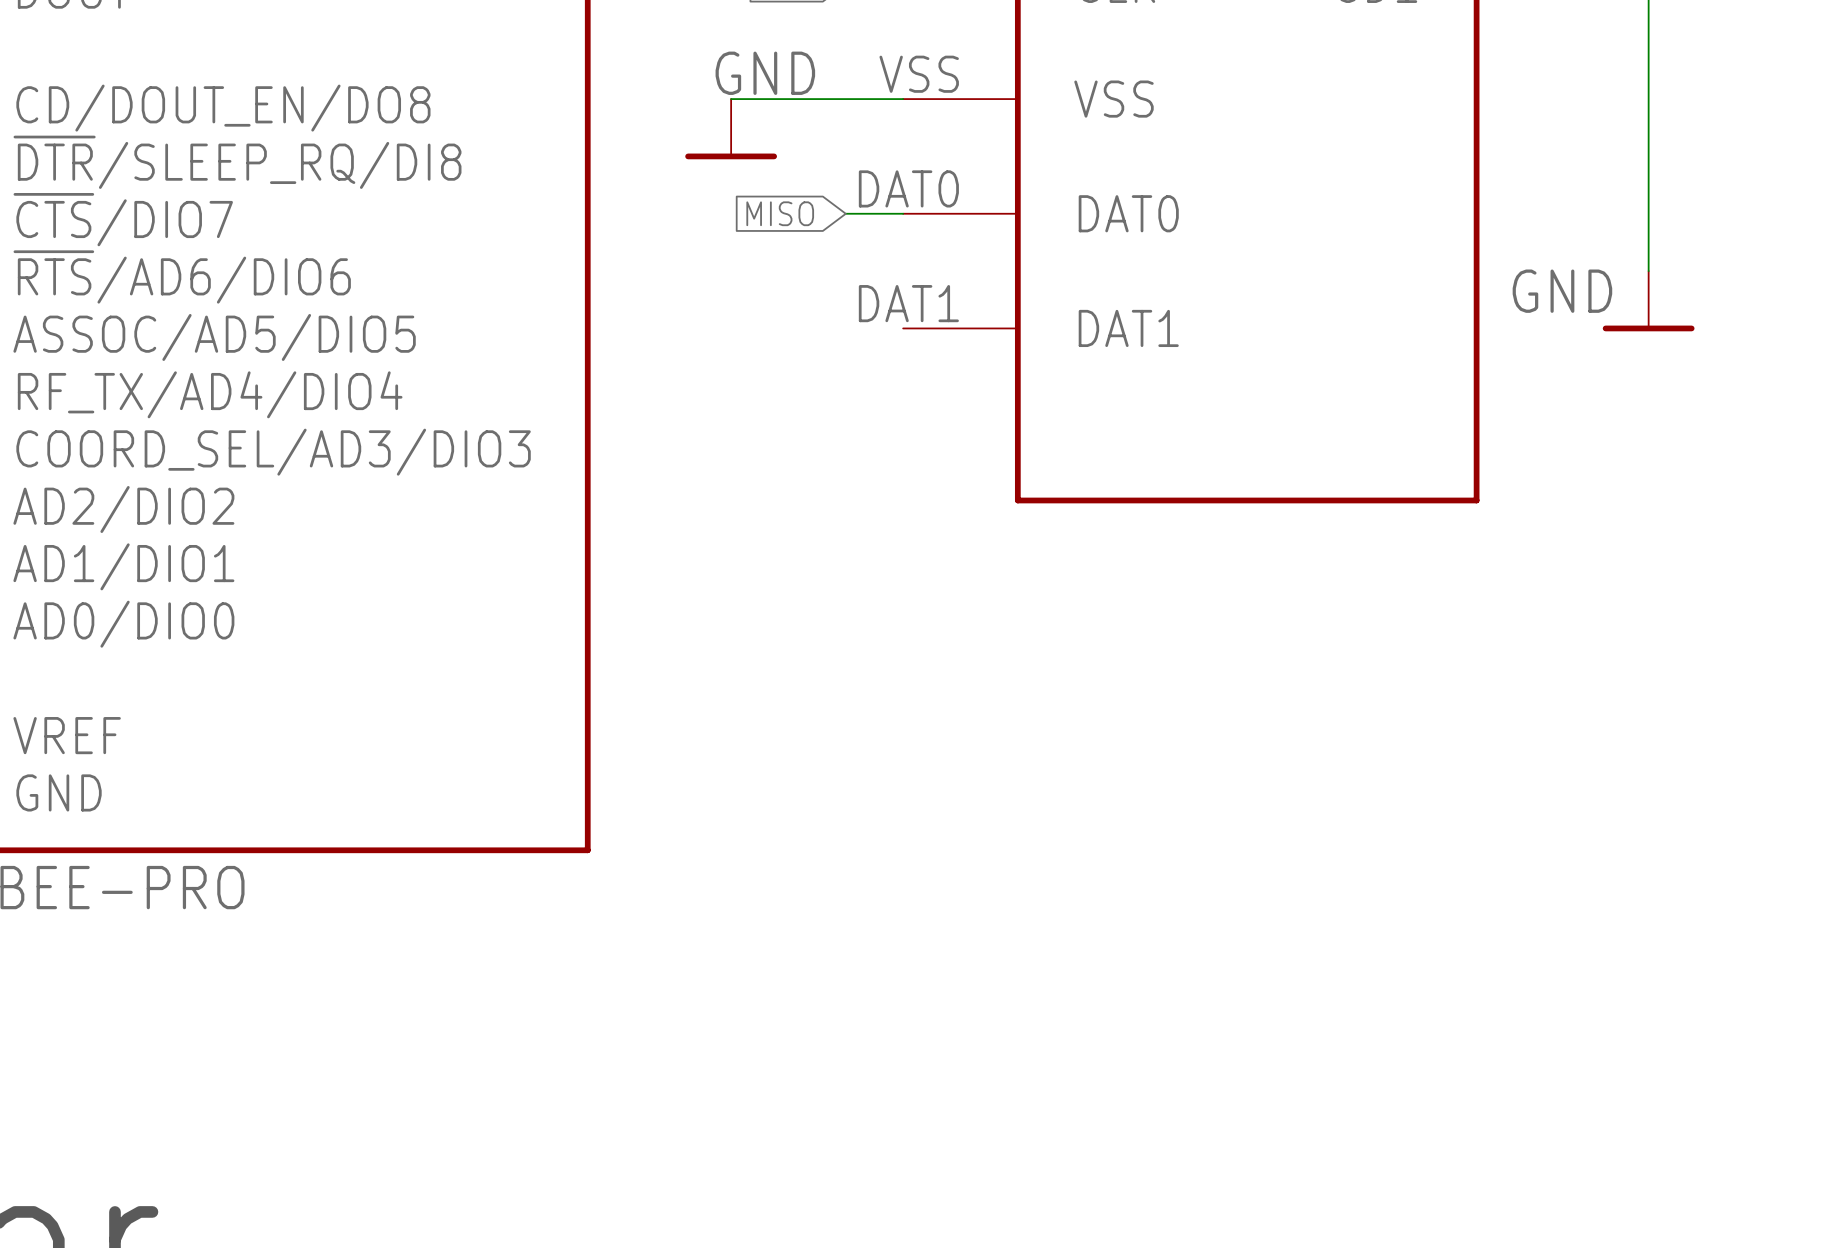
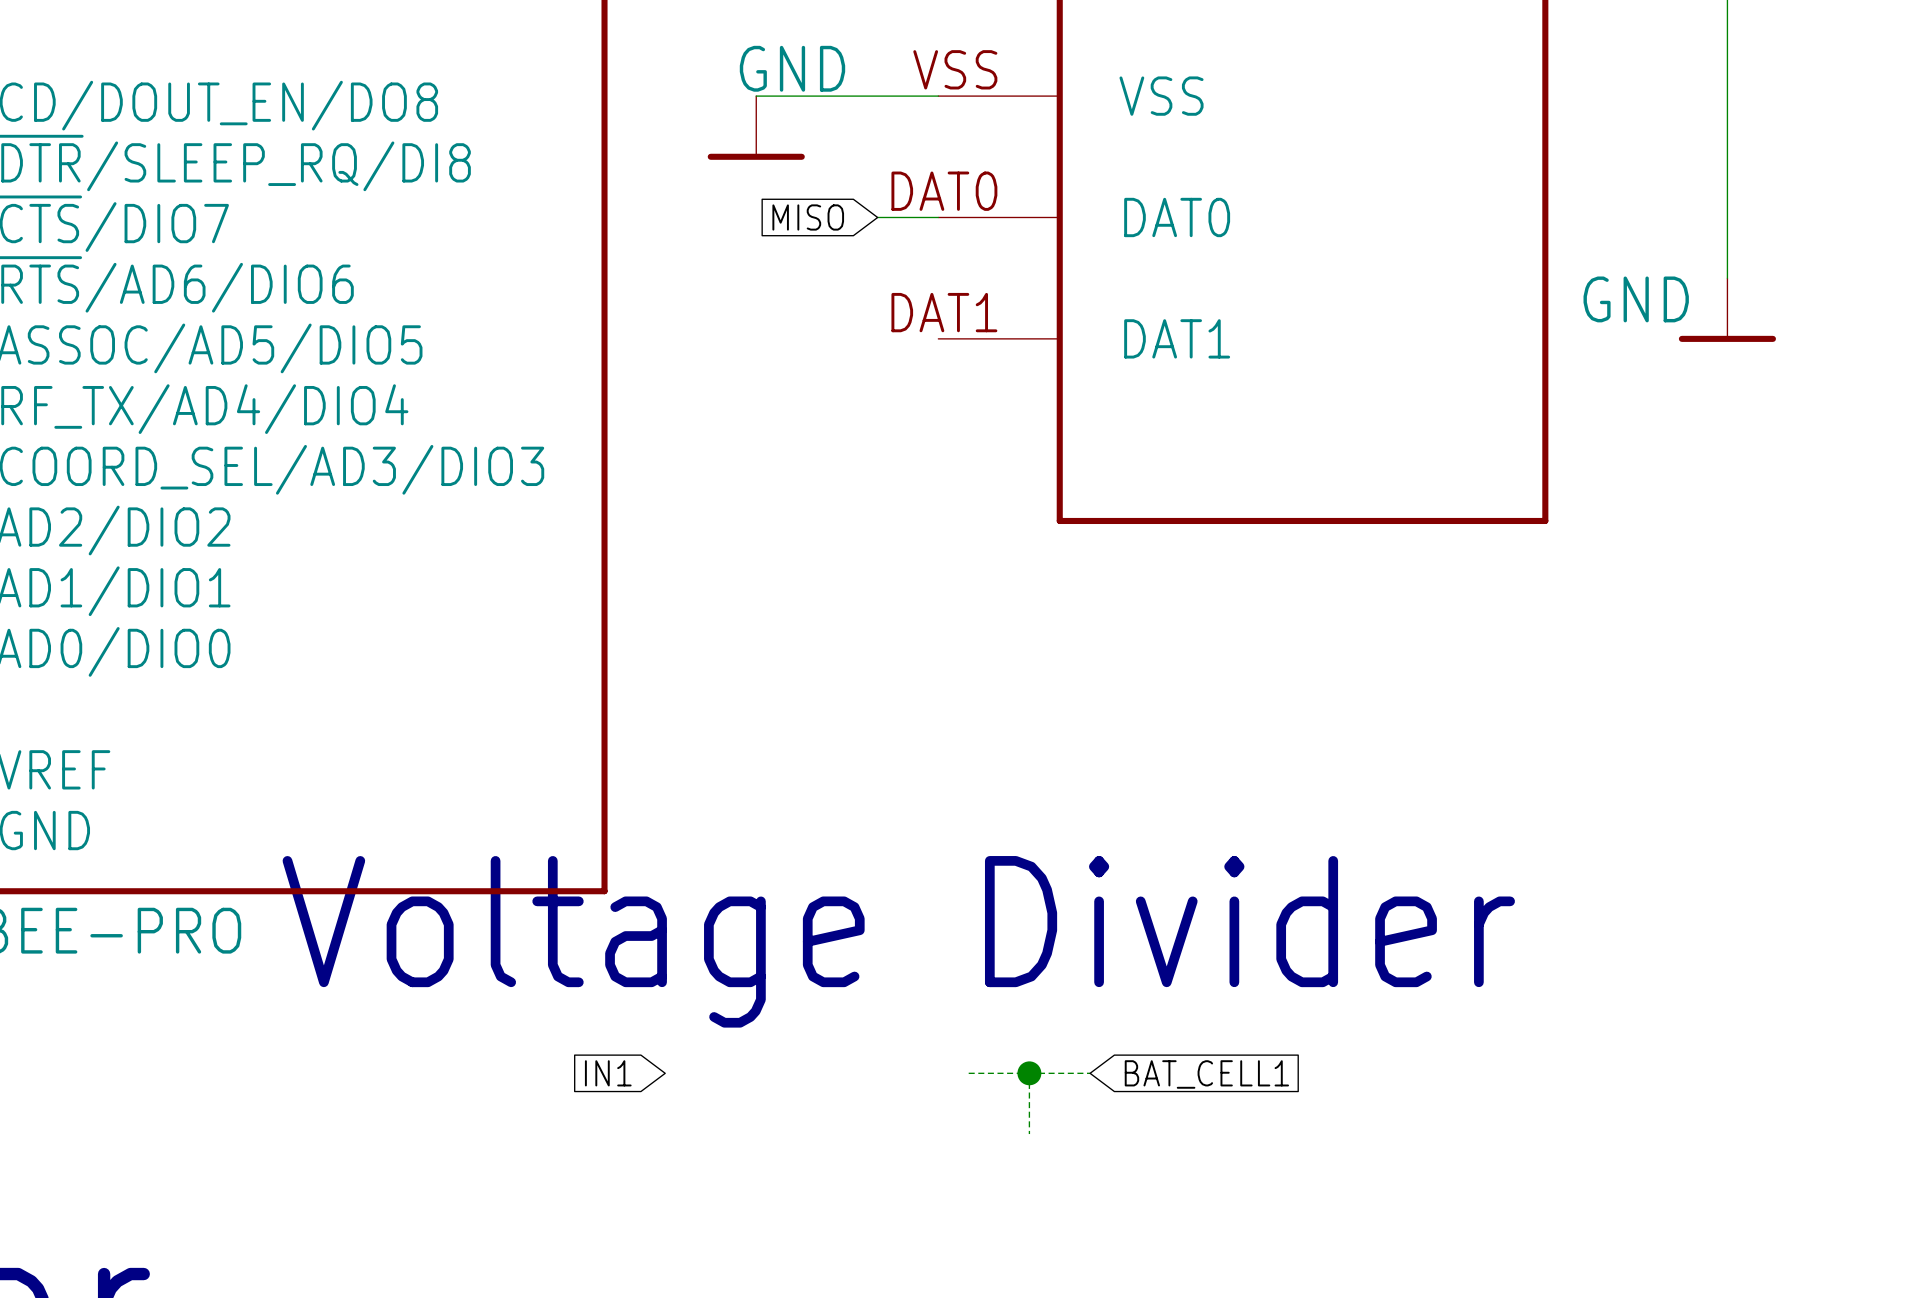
text: none -> Voltage Divider (898, 941)
global label: none -> IN1 (608, 1073)
wire: none -> (968, 1073) (1090, 1073)
wire: none -> (1029, 1073) (1029, 1134)
junction: none -> (1029, 1073)
global label: none -> BAT_CELL1 (1206, 1074)

